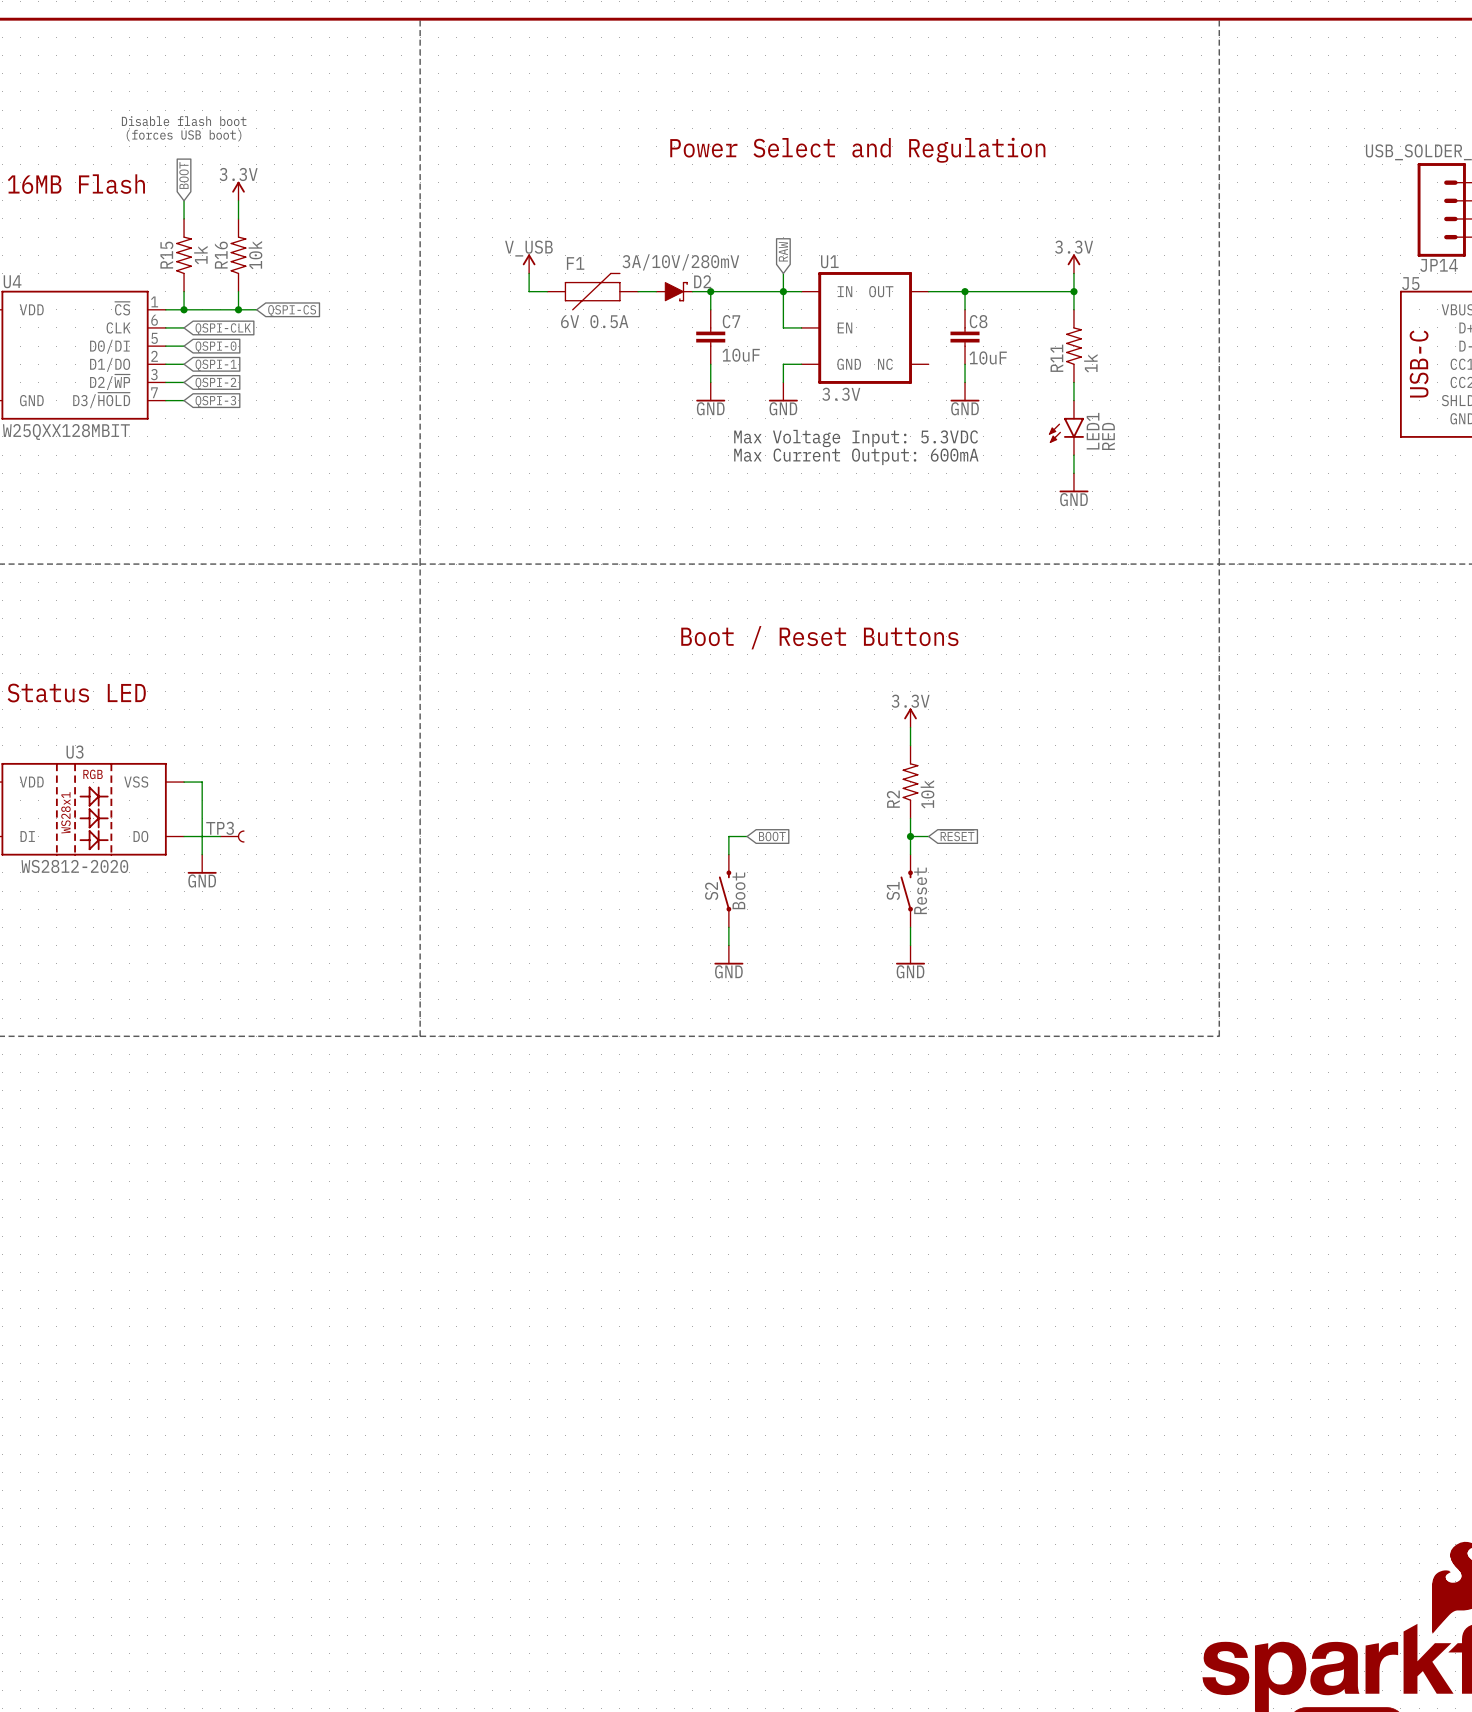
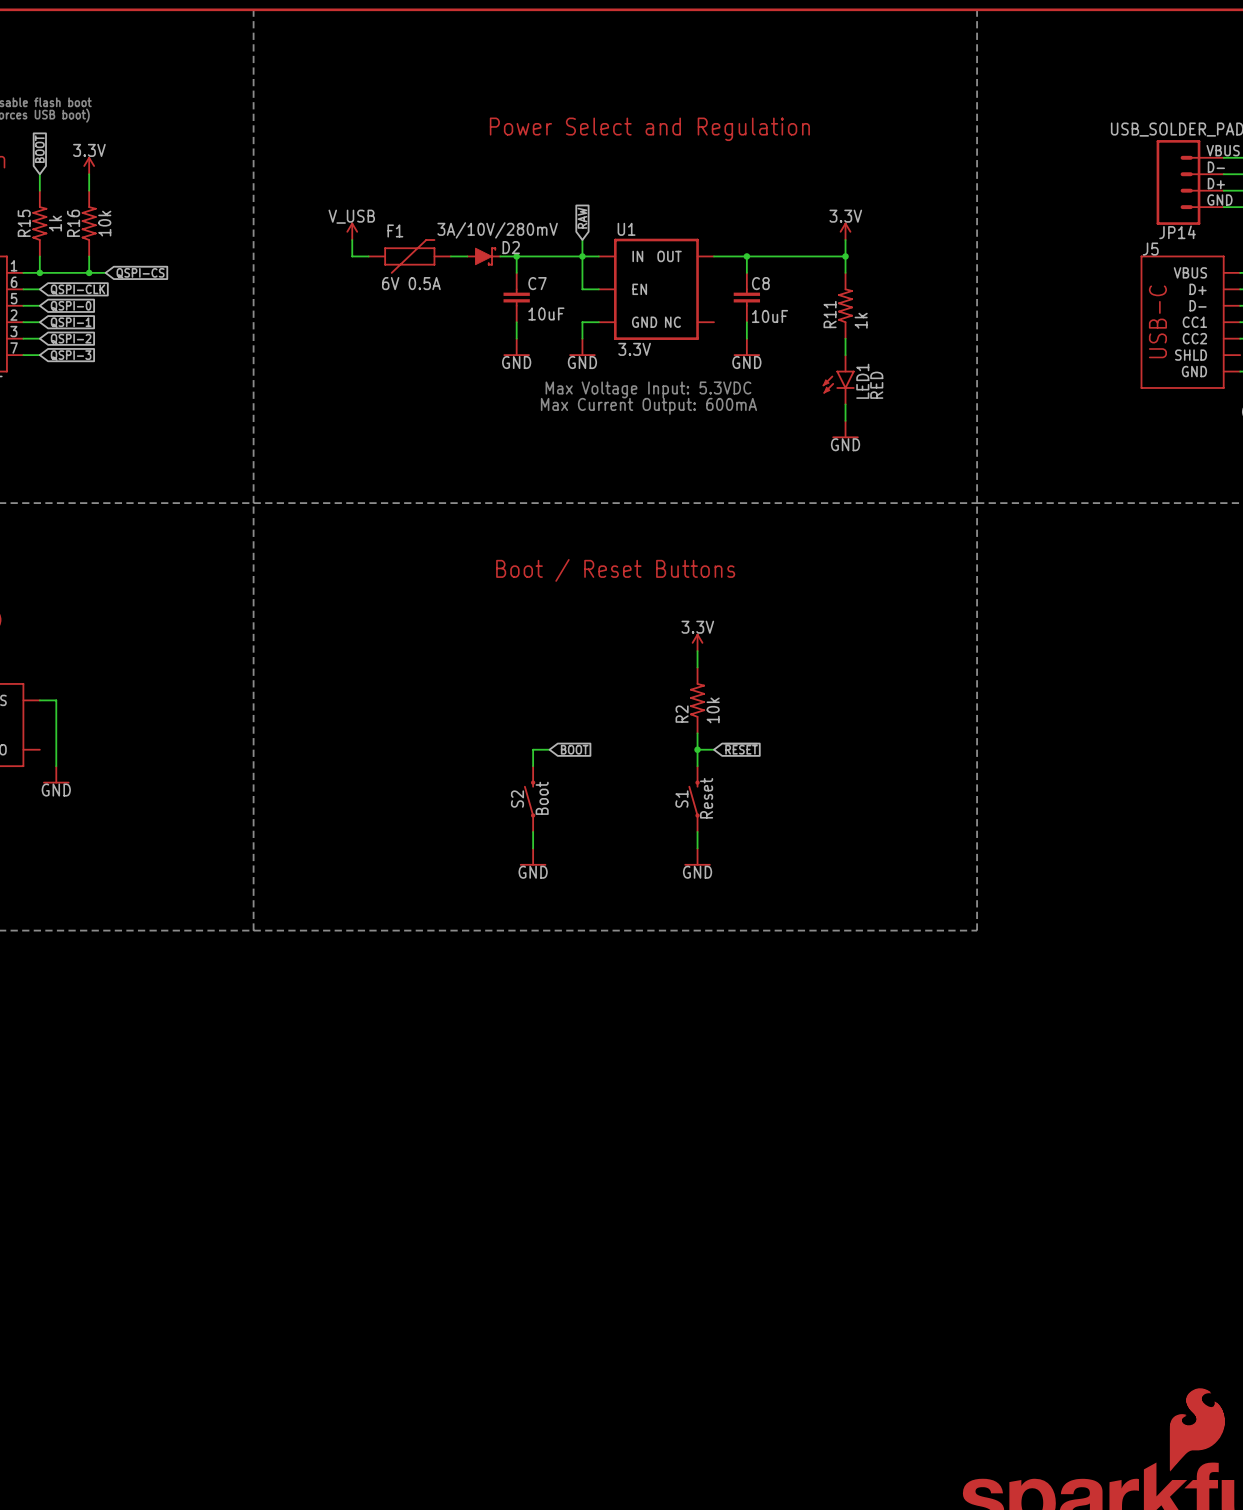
wire: (184, 836) (220, 836) -> none
TP3: (232, 836) -> none

